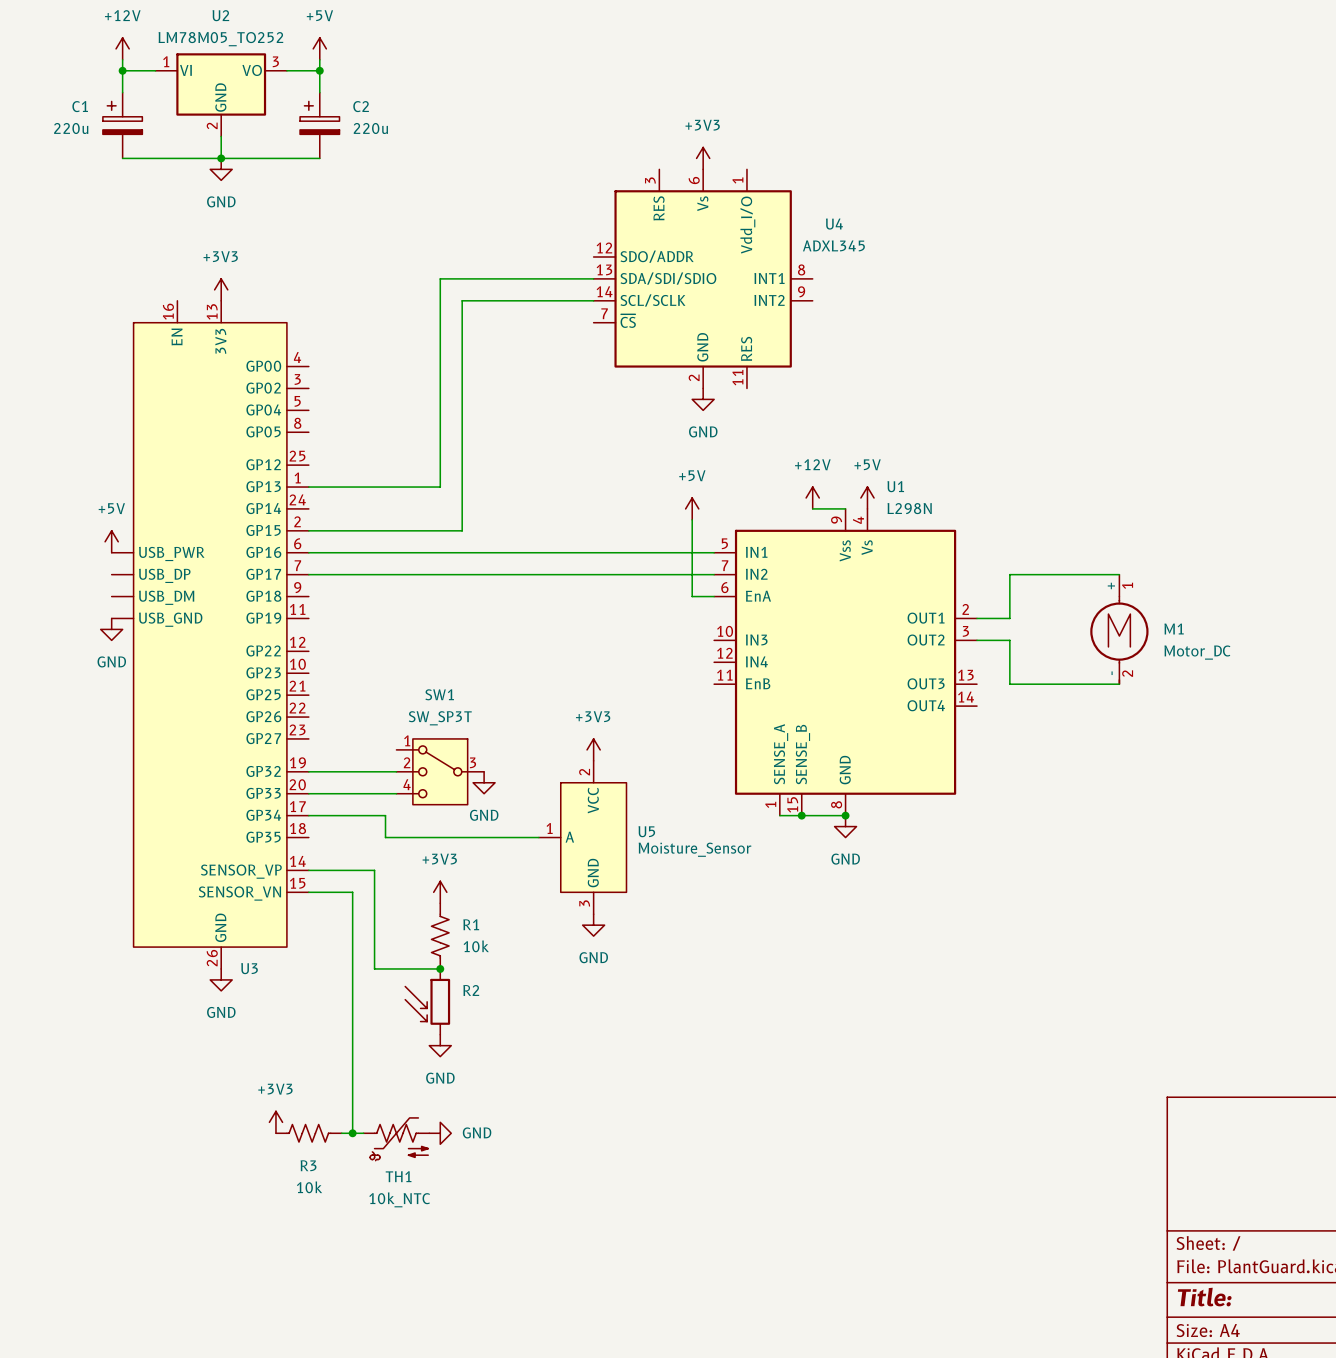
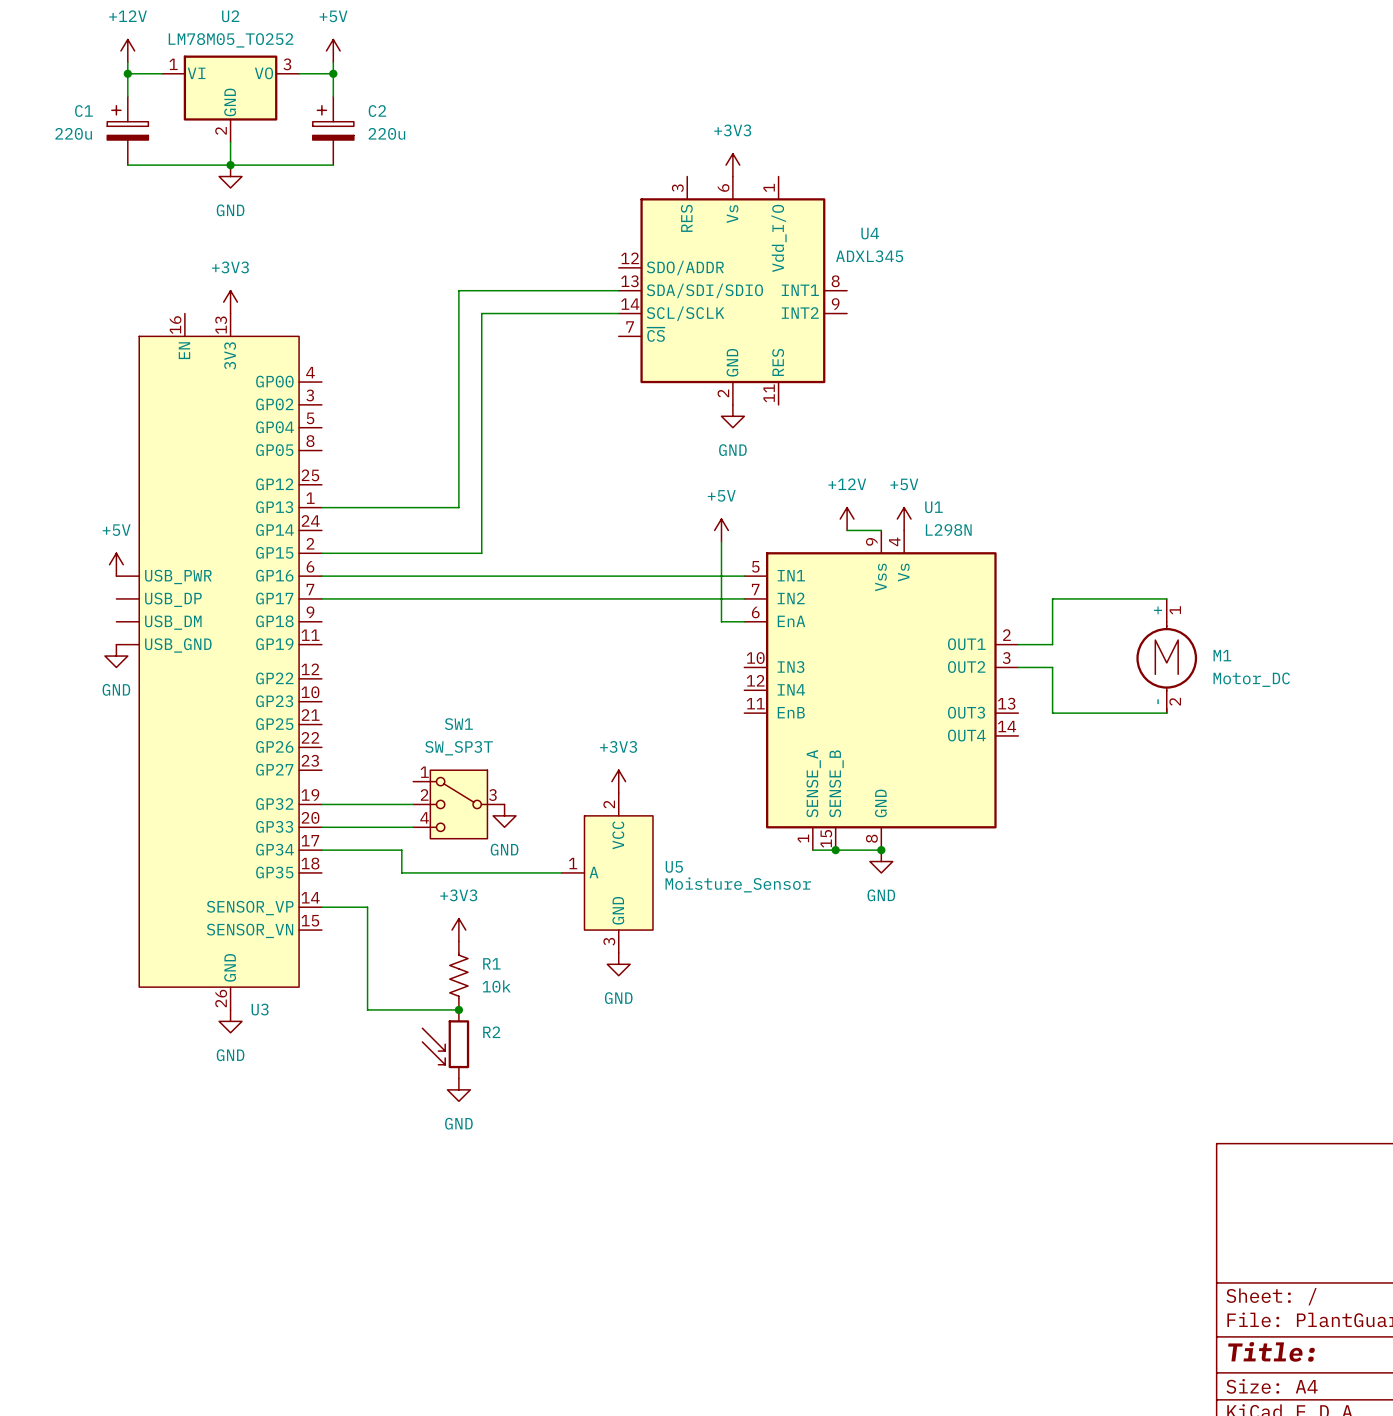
wire: (352, 870) (374, 870) (374, 968) -> (367, 1009) (390, 1009)
wire: (308, 892) (352, 892) -> (367, 907) (367, 930)
wire: (352, 968) (352, 1133) -> none
power symbol: +3V3 (275, 1122) -> none
R3: 10k (308, 1133) -> none
wire: (341, 1133) (363, 1133) -> none
junction: (352, 1133) -> none
power symbol: GND (440, 1133) -> none
TH1: 10k_NTC (396, 1139) -> none

